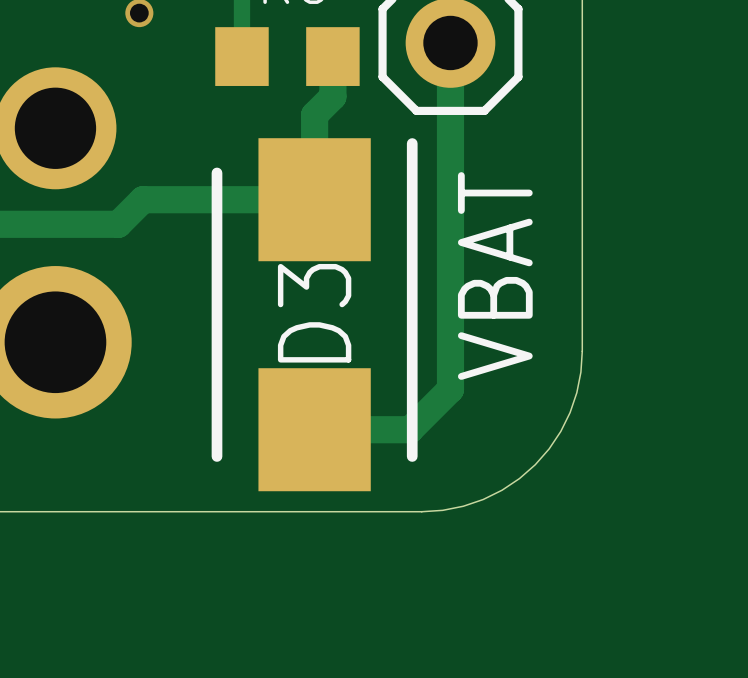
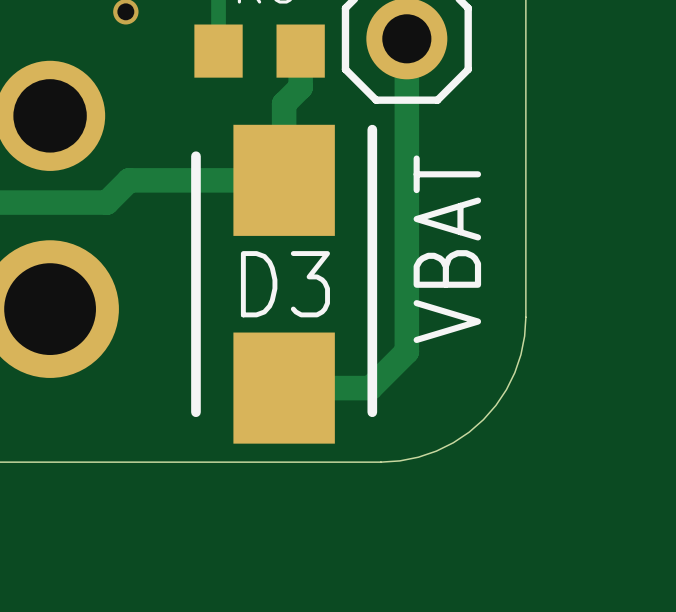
D3 name rotation: 0° (314, 313) -> 90° clockwise (285, 284)

